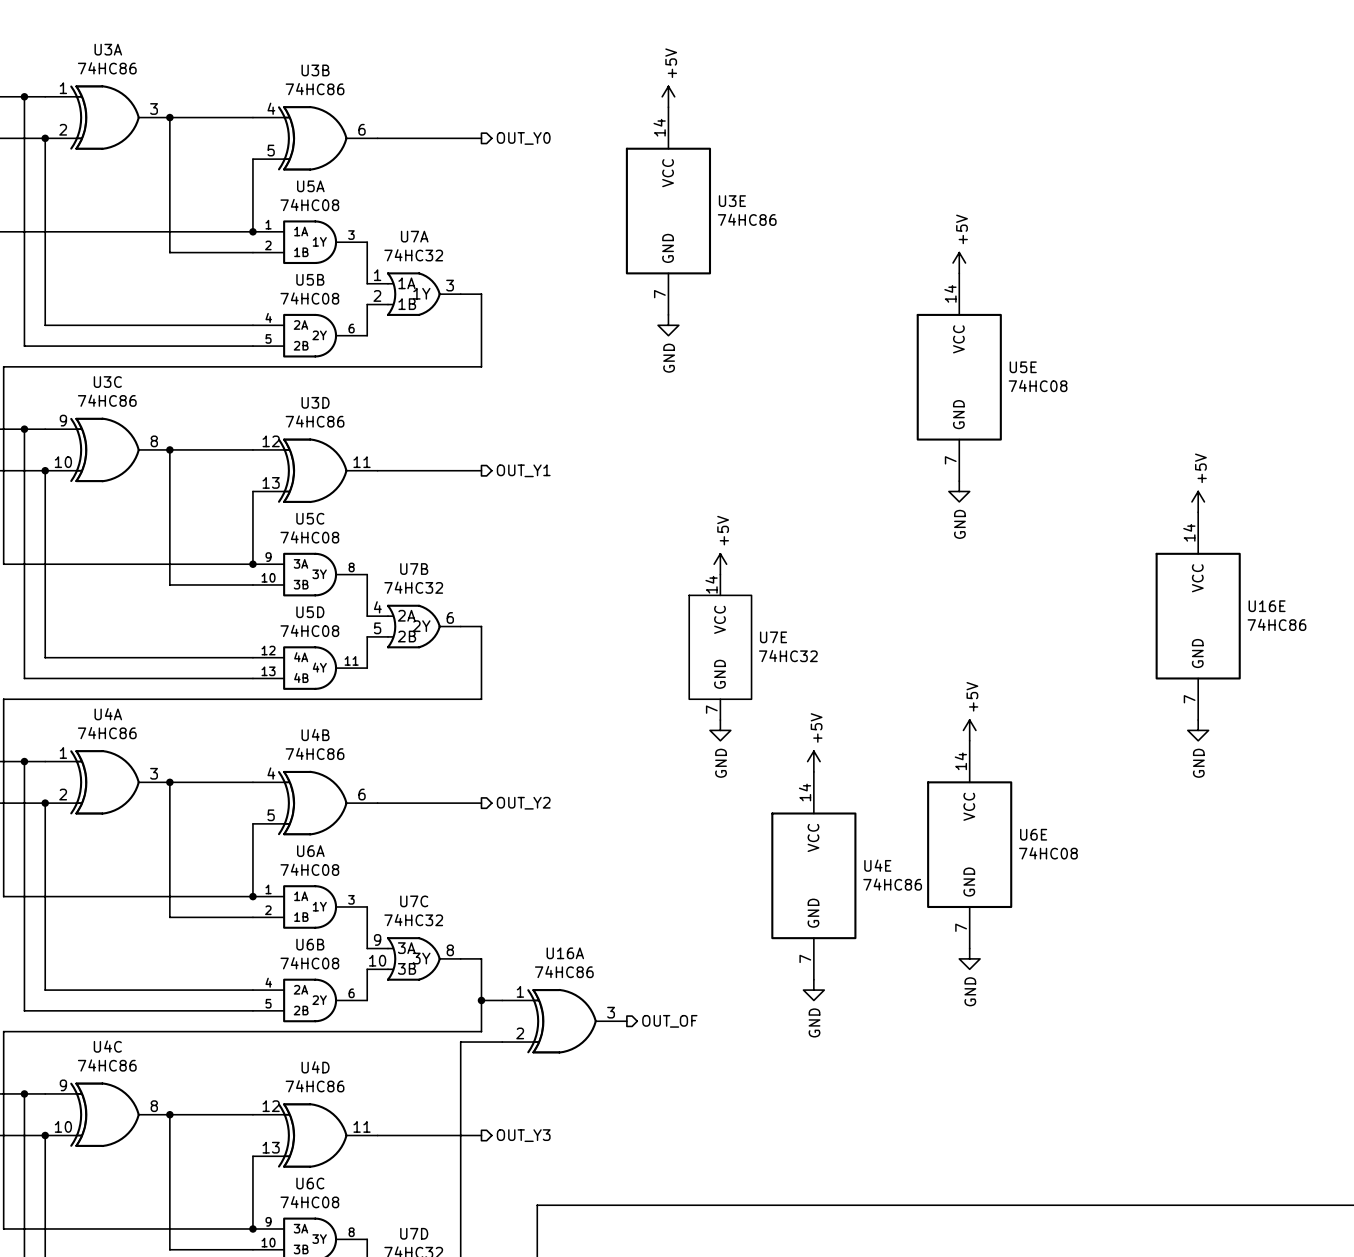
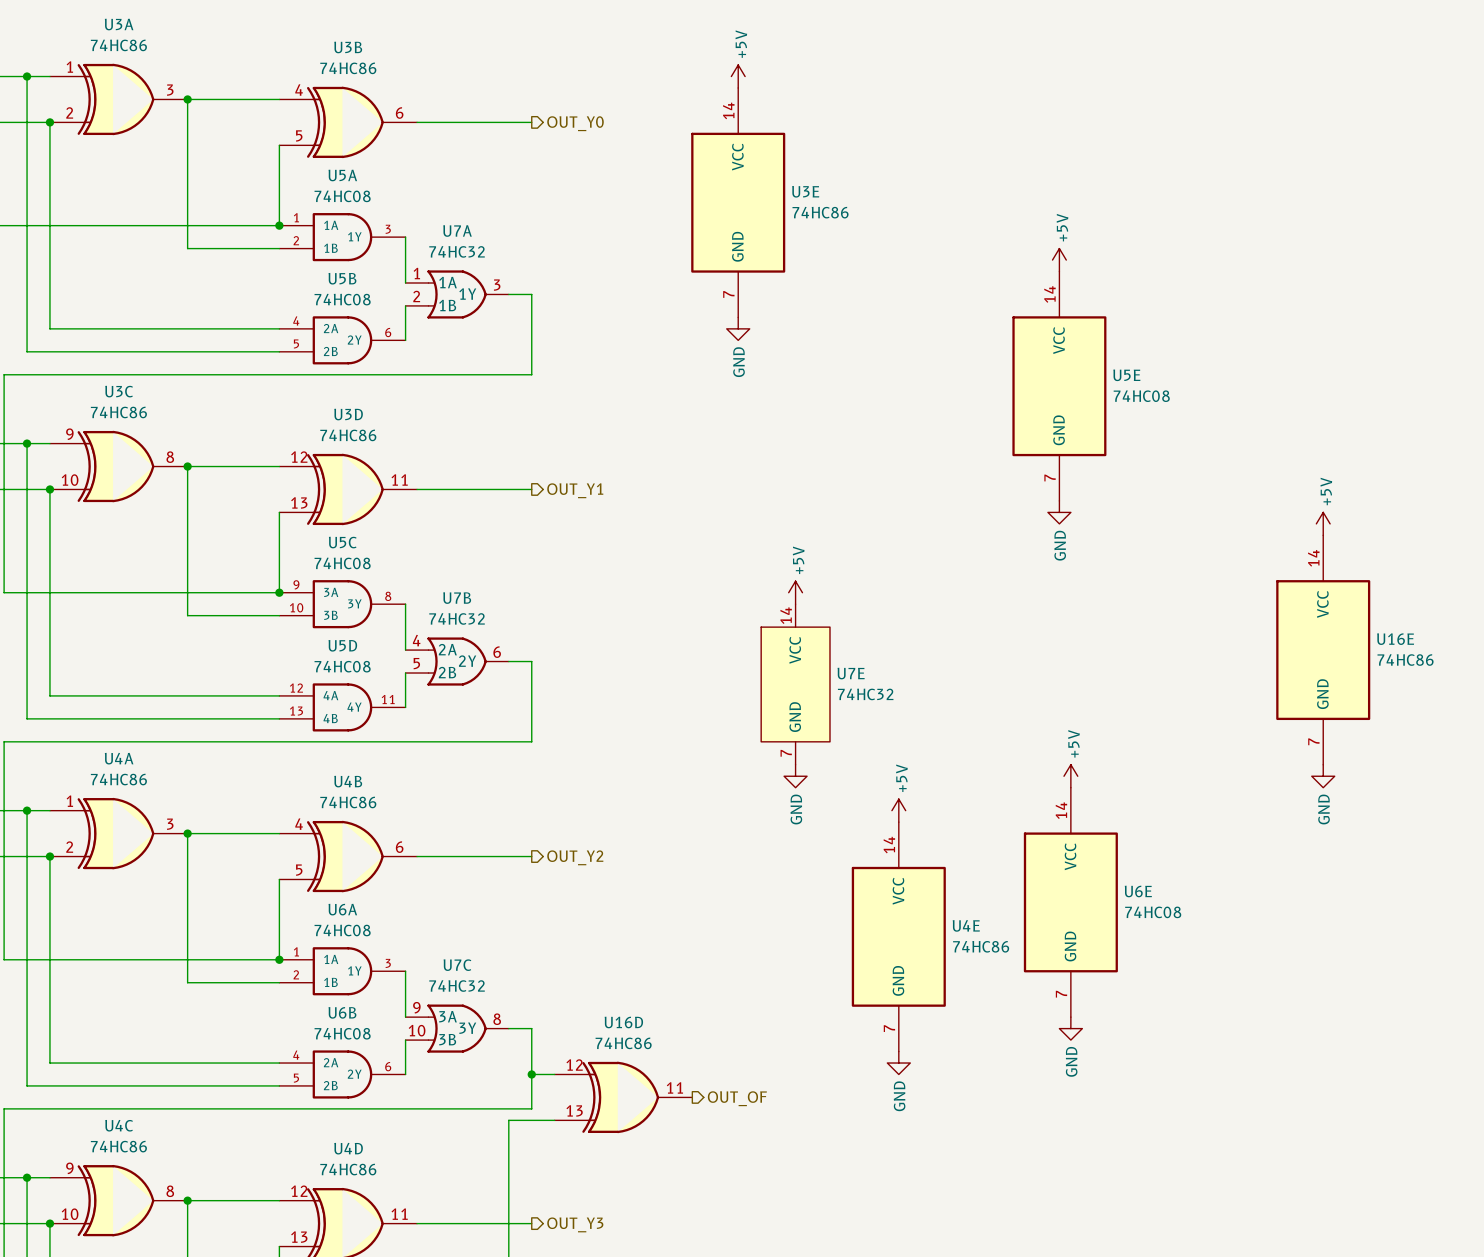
U16A name: U16A (565, 953) -> U16D (623, 1022)
U16A pin number: 1 (520, 991) -> 12 (574, 1065)
U16A pin number: 3 (611, 1012) -> 11 (674, 1087)
U16A pin number: 2 (520, 1033) -> 13 (574, 1110)

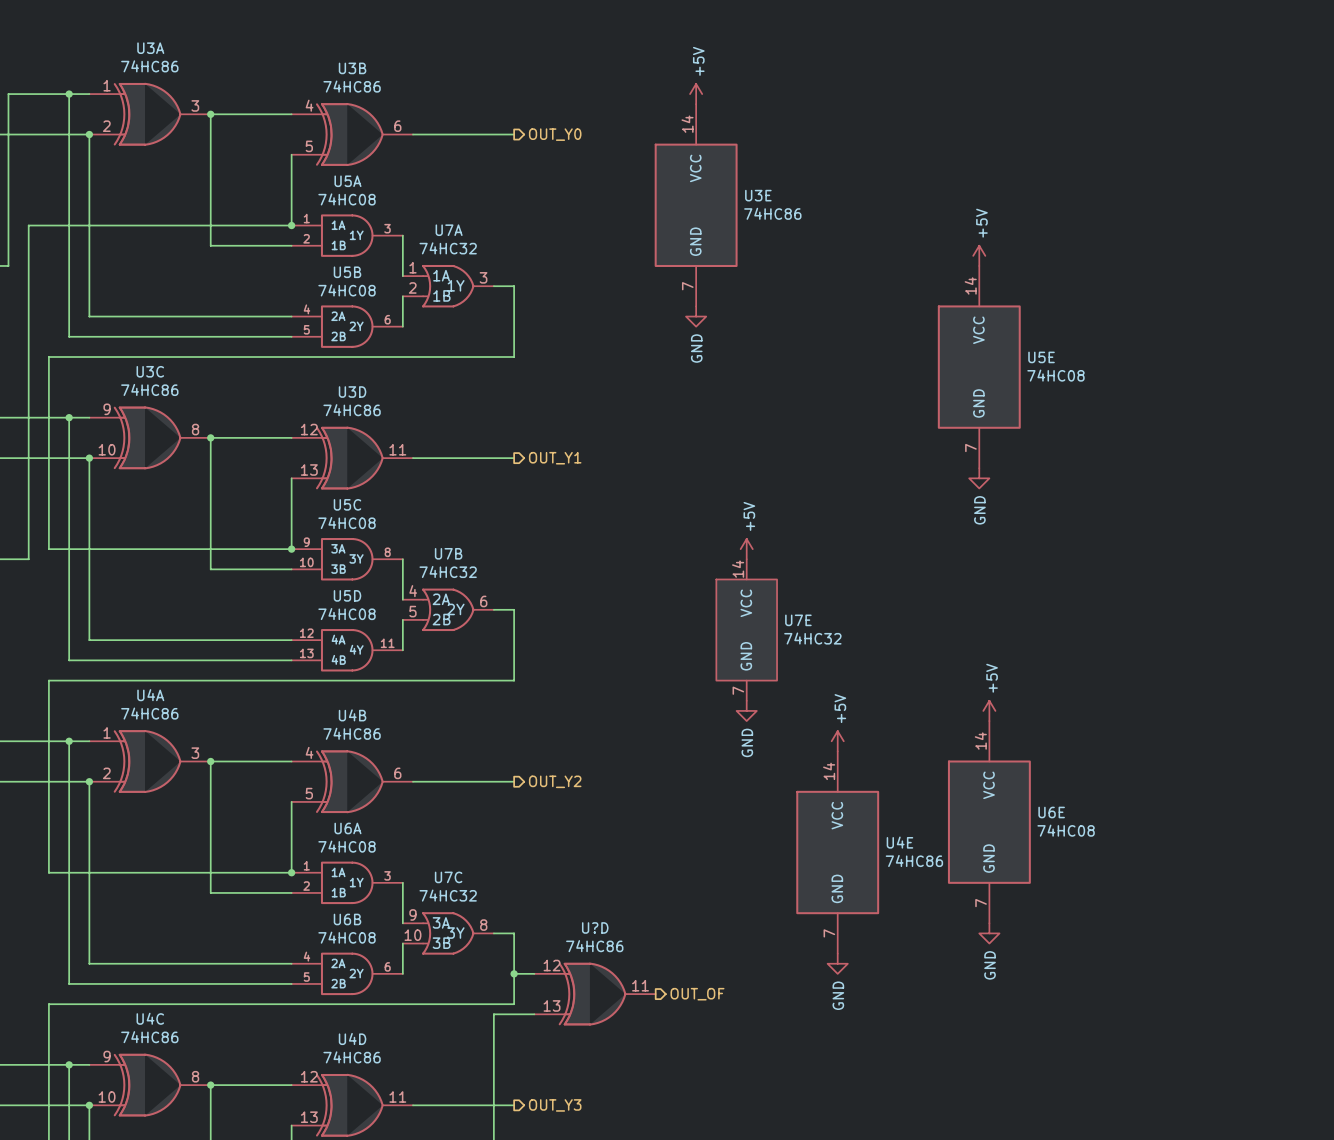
power symbol: +5V (1323, 523) -> none
U16E: 74HC86 (1323, 650) -> none
power symbol: GND (1323, 776) -> none
U16D name: U16D (623, 1022) -> U?D (595, 927)

